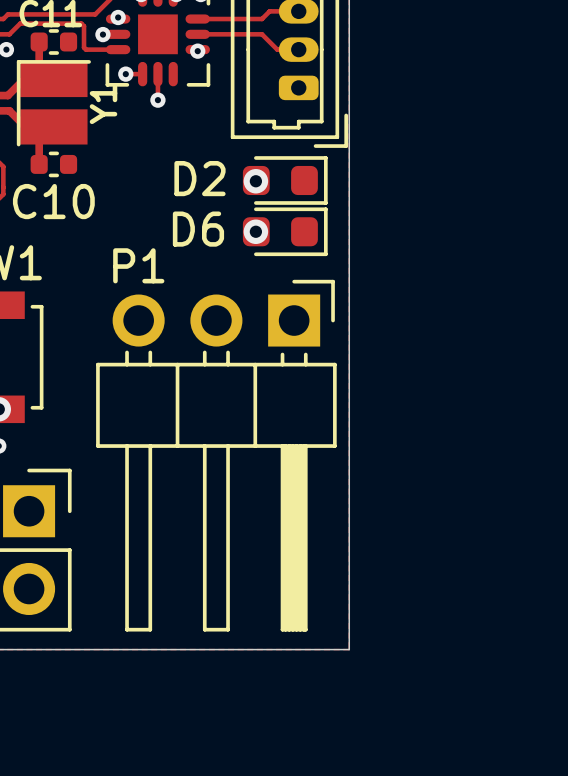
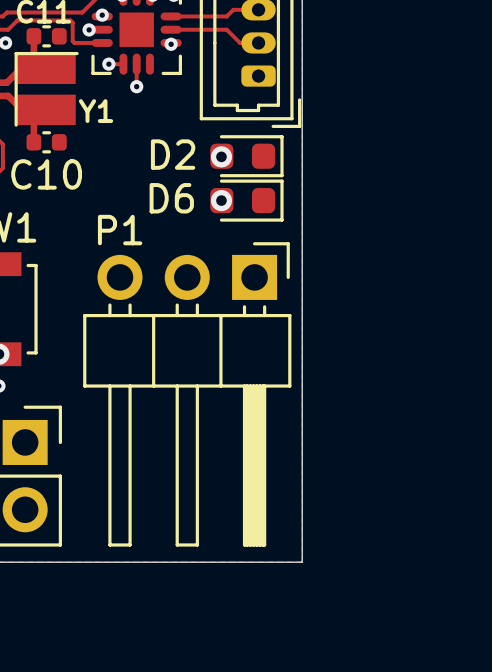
Y1 name rotation: 0° (103, 104) -> 90° clockwise (96, 111)

